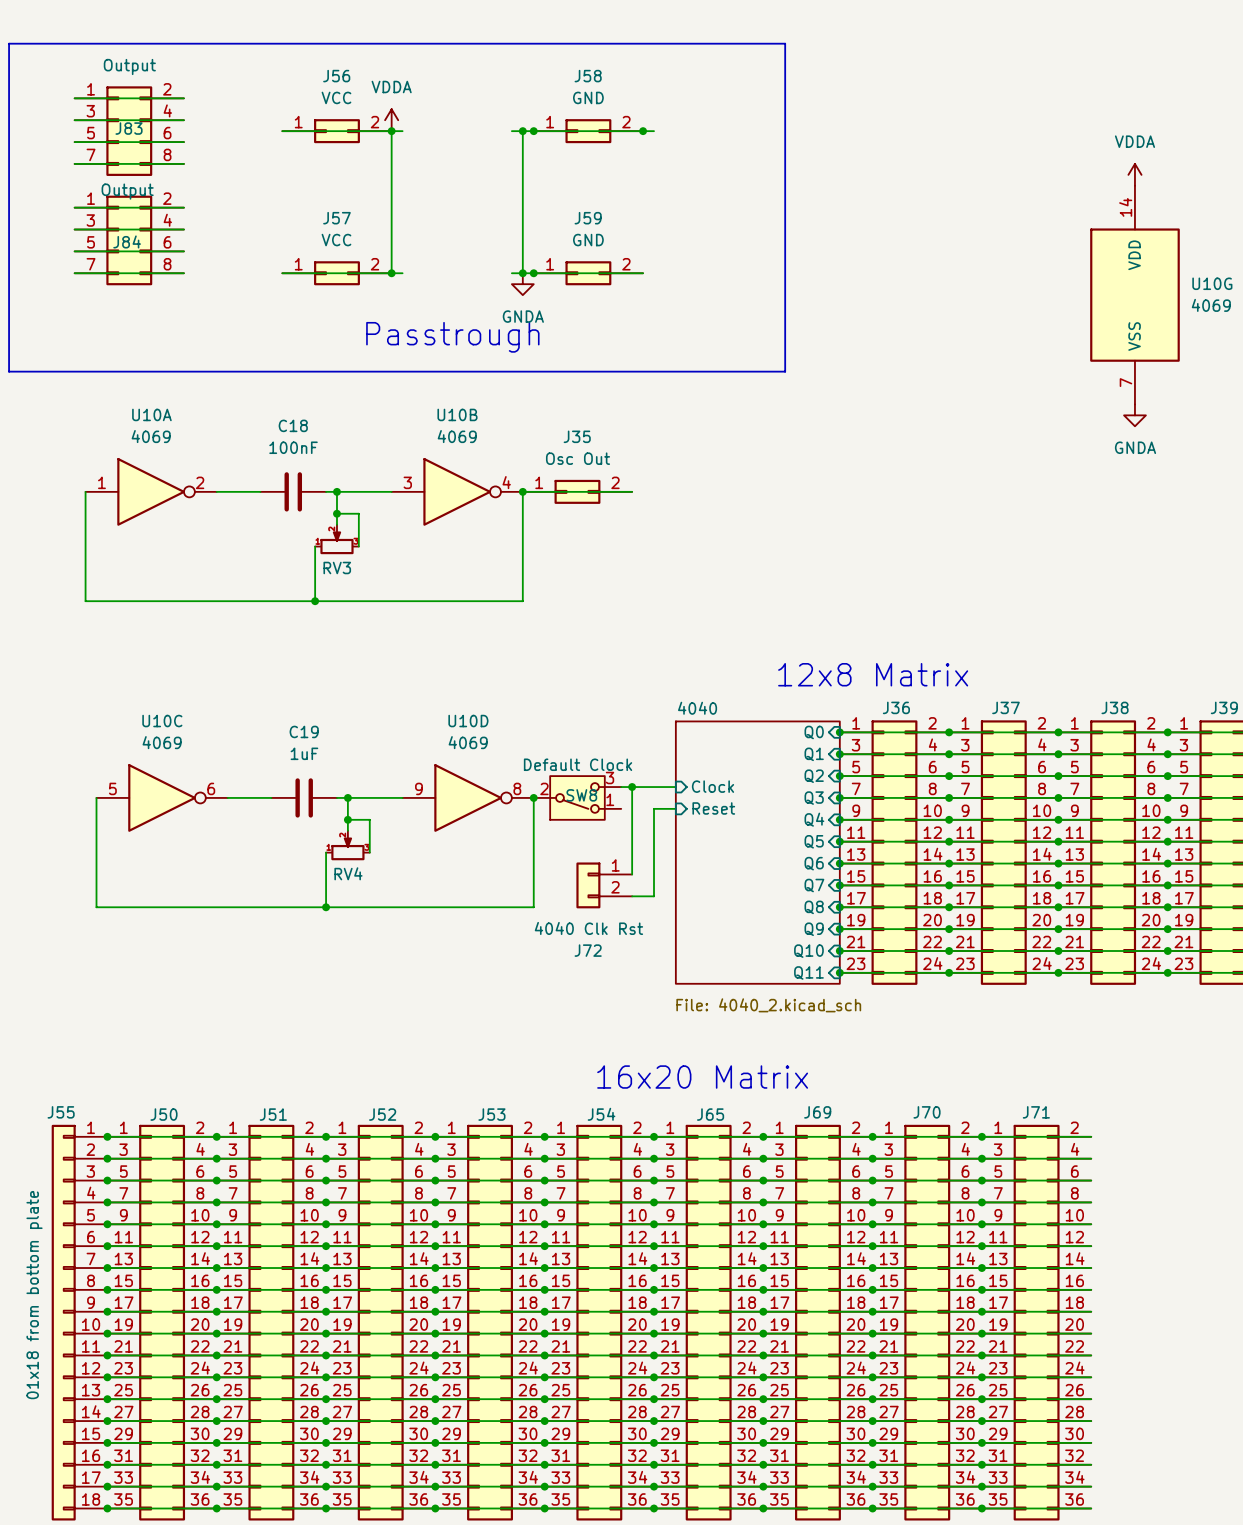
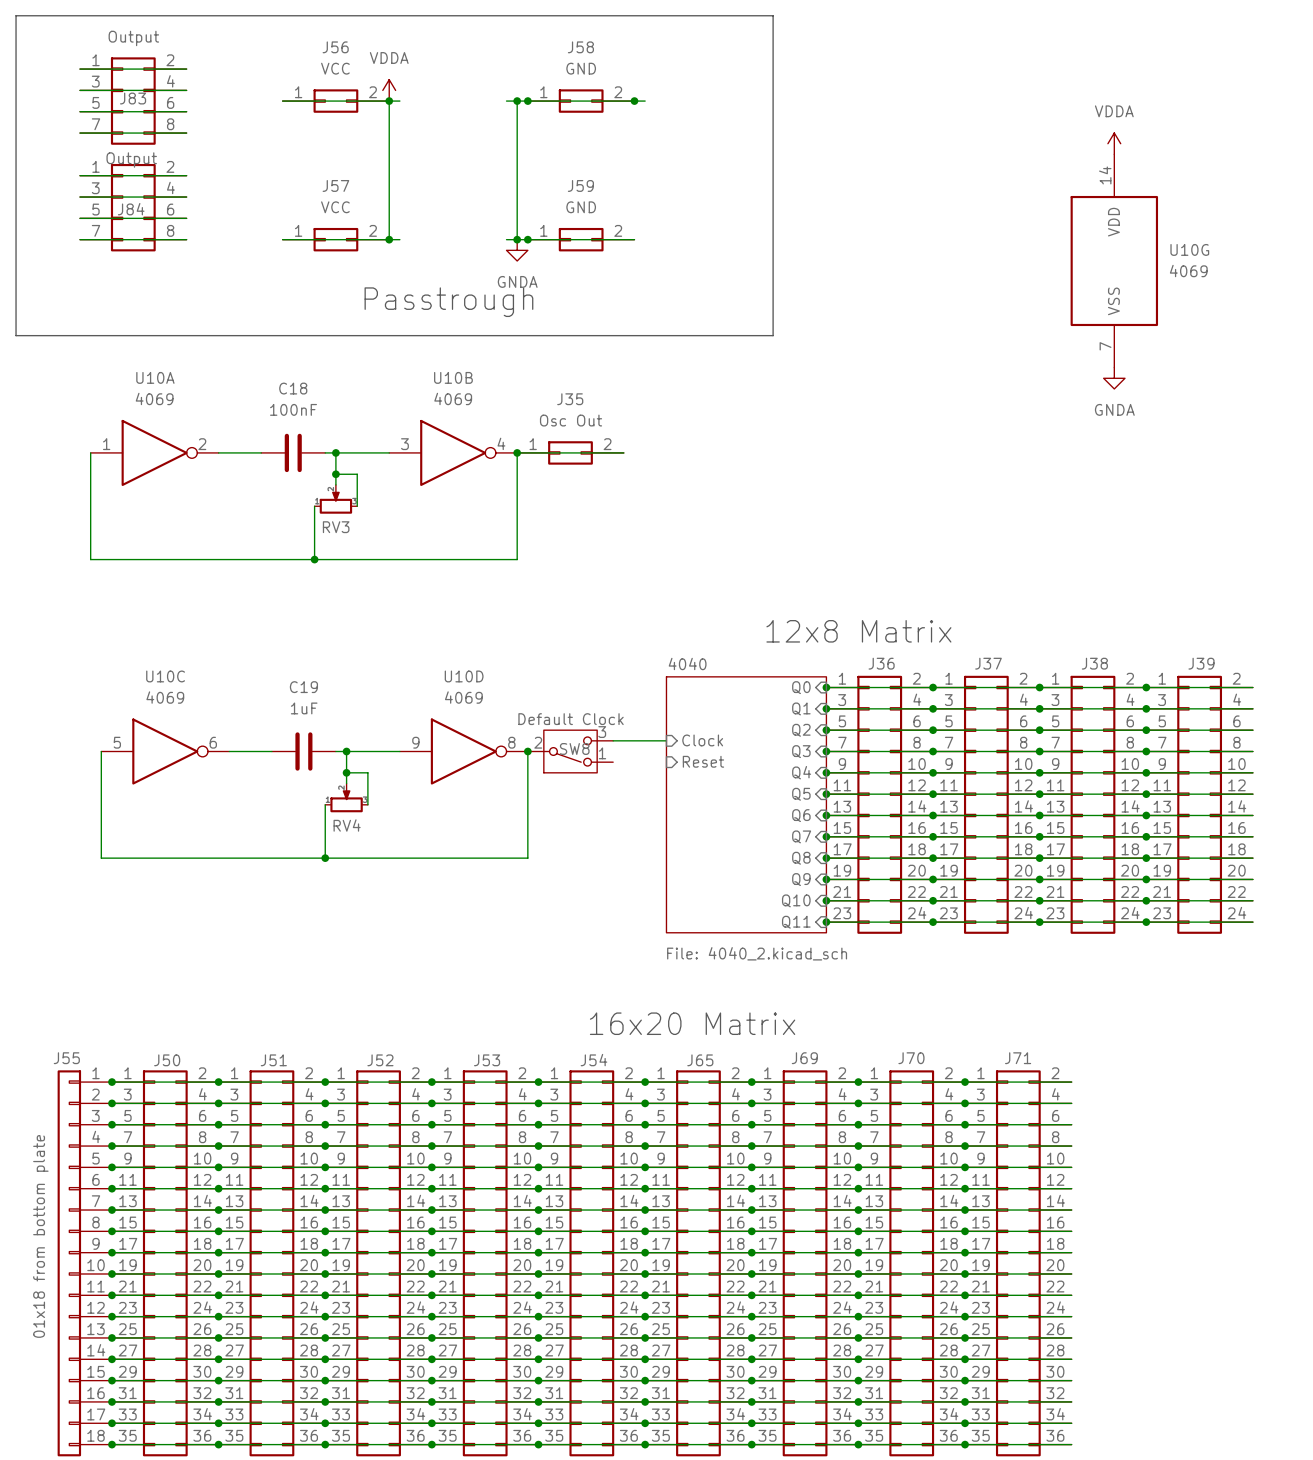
wire: (632, 787) (632, 874) -> none
junction: (632, 787) -> none
wire: (675, 808) (654, 808) (654, 896) (632, 896) -> none
J72: 4040 Clk Rst (604, 885) -> none

